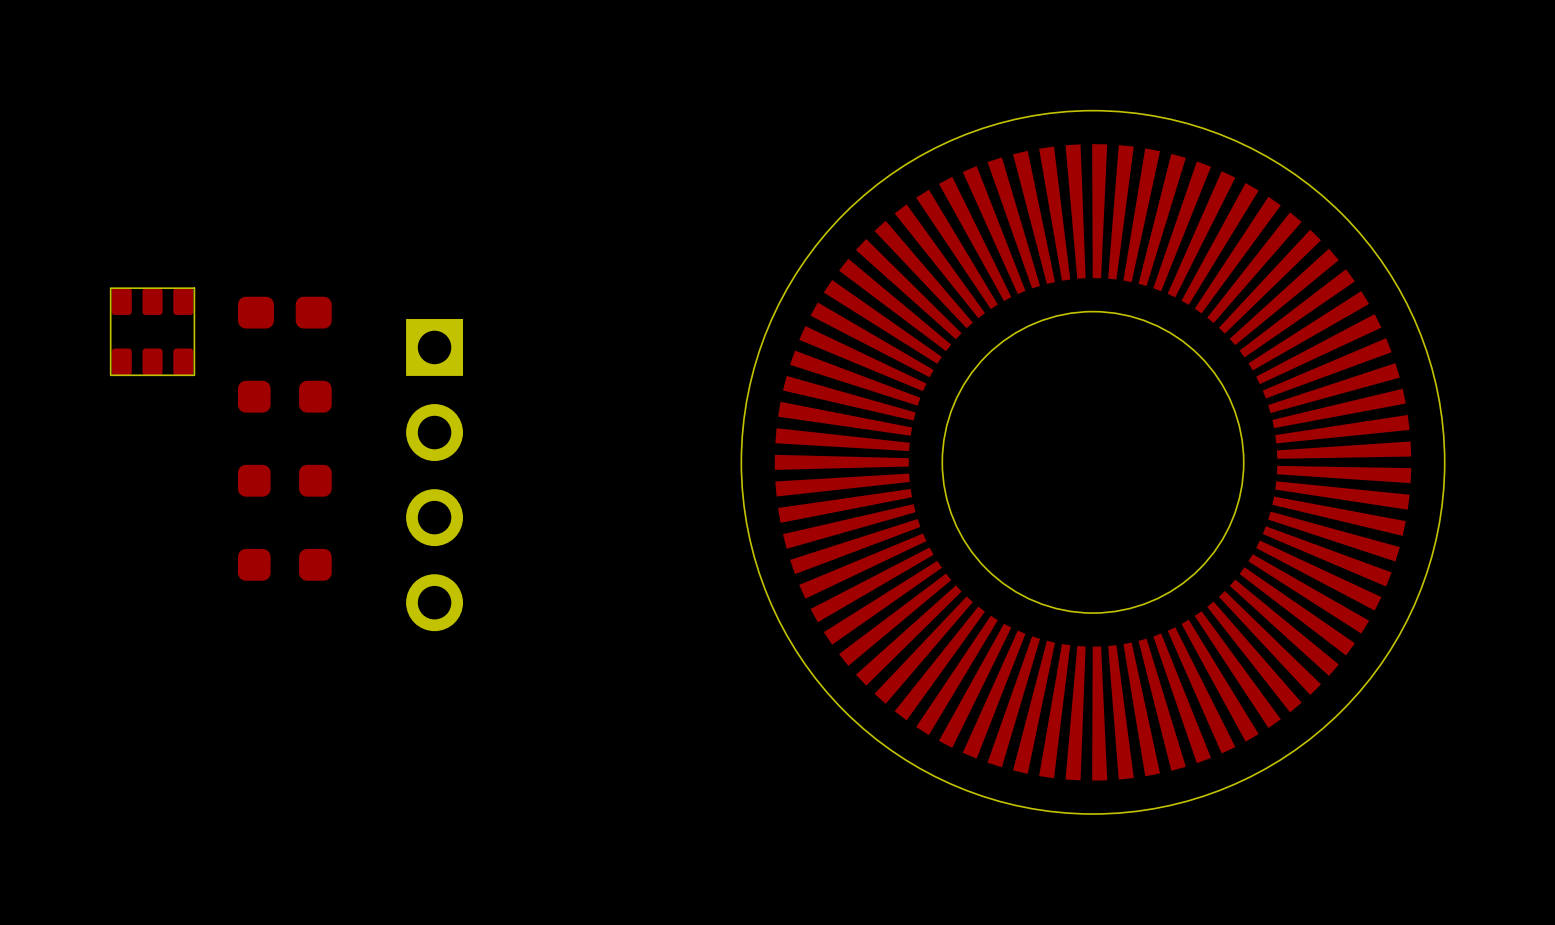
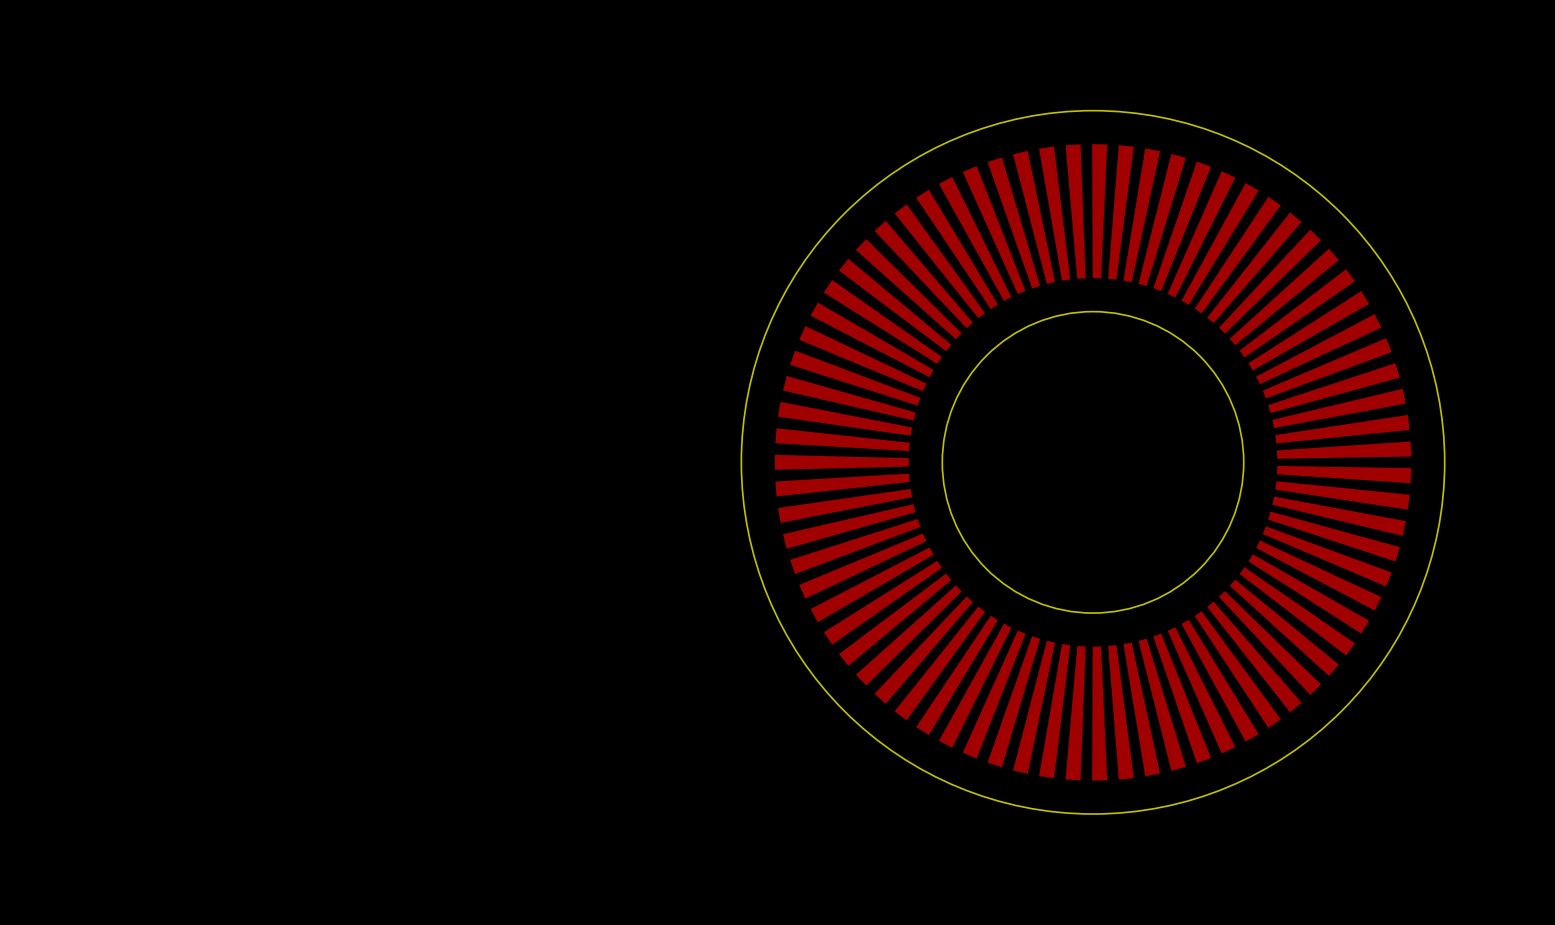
part: (284, 312) -> none
part: (152, 331) -> none
part: (284, 396) -> none
part: (434, 475) -> none
part: (284, 480) -> none
part: (284, 564) -> none

